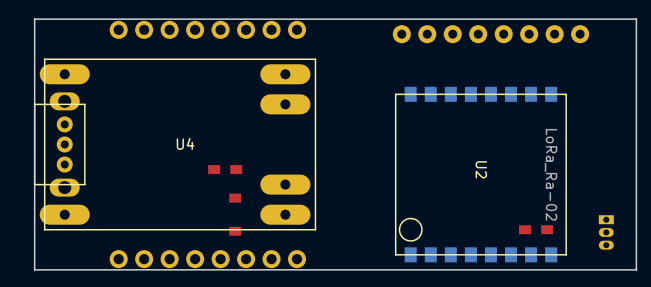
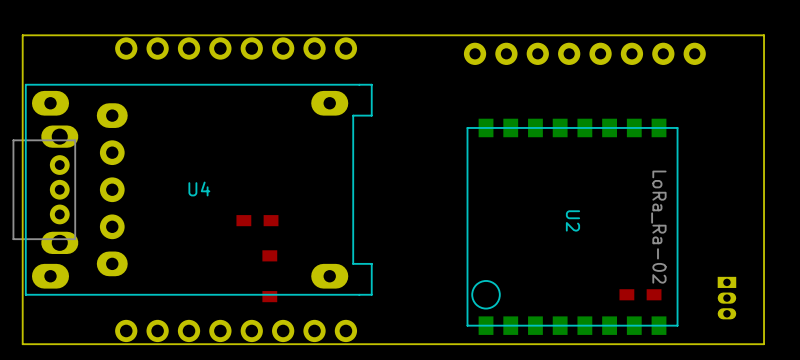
U4 footprint: [33, 58, 317, 231] -> [12, 83, 373, 296]
part: none -> (112, 189)

